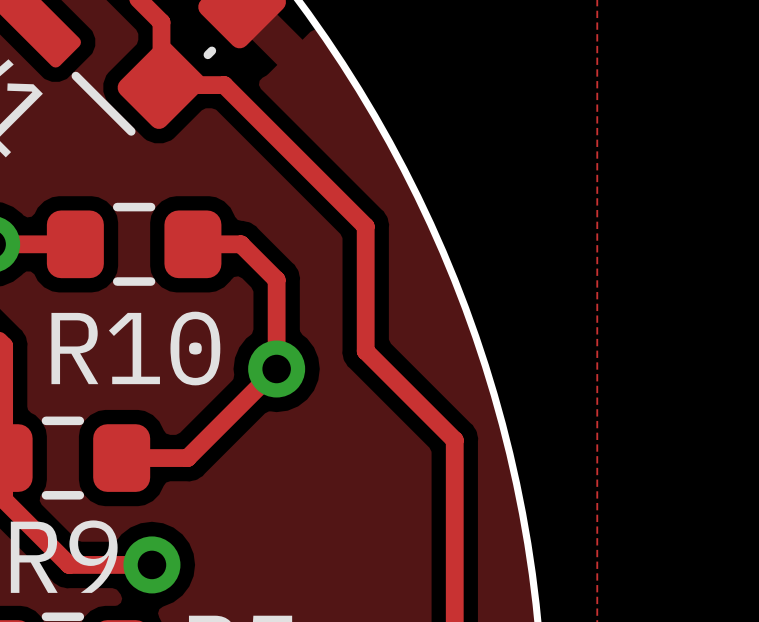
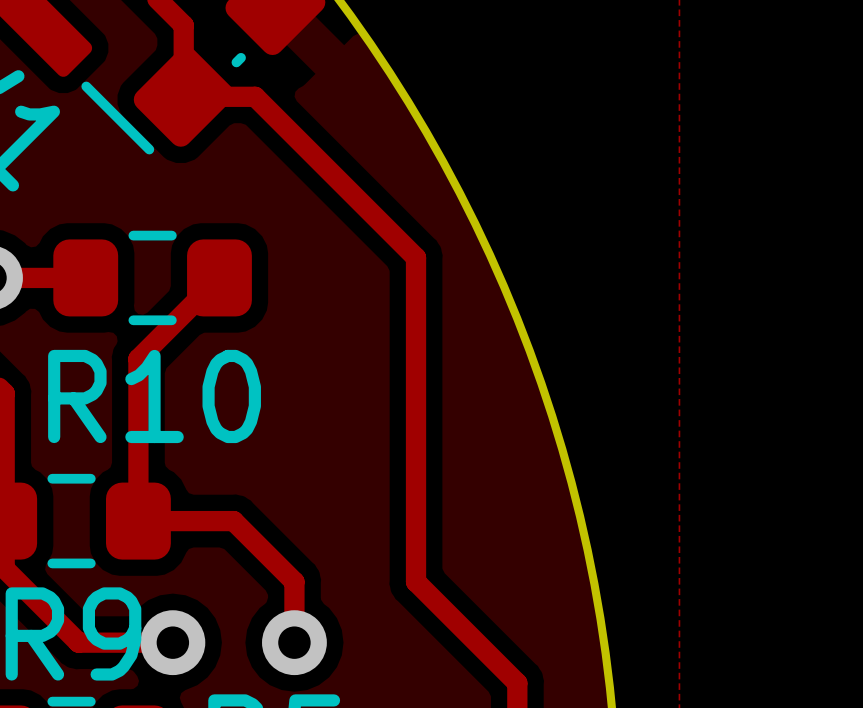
track: (192, 244) (241, 244) (276, 279) (276, 369) (187, 458) -> (219, 277) (138, 358) (138, 521)
track: (365, 351) (454, 440) (454, 600) -> (416, 399) (416, 581) (517, 683)
via position: (276, 369) -> (294, 642)
track: none -> (213, 521) (233, 521) (294, 581) (294, 642)

